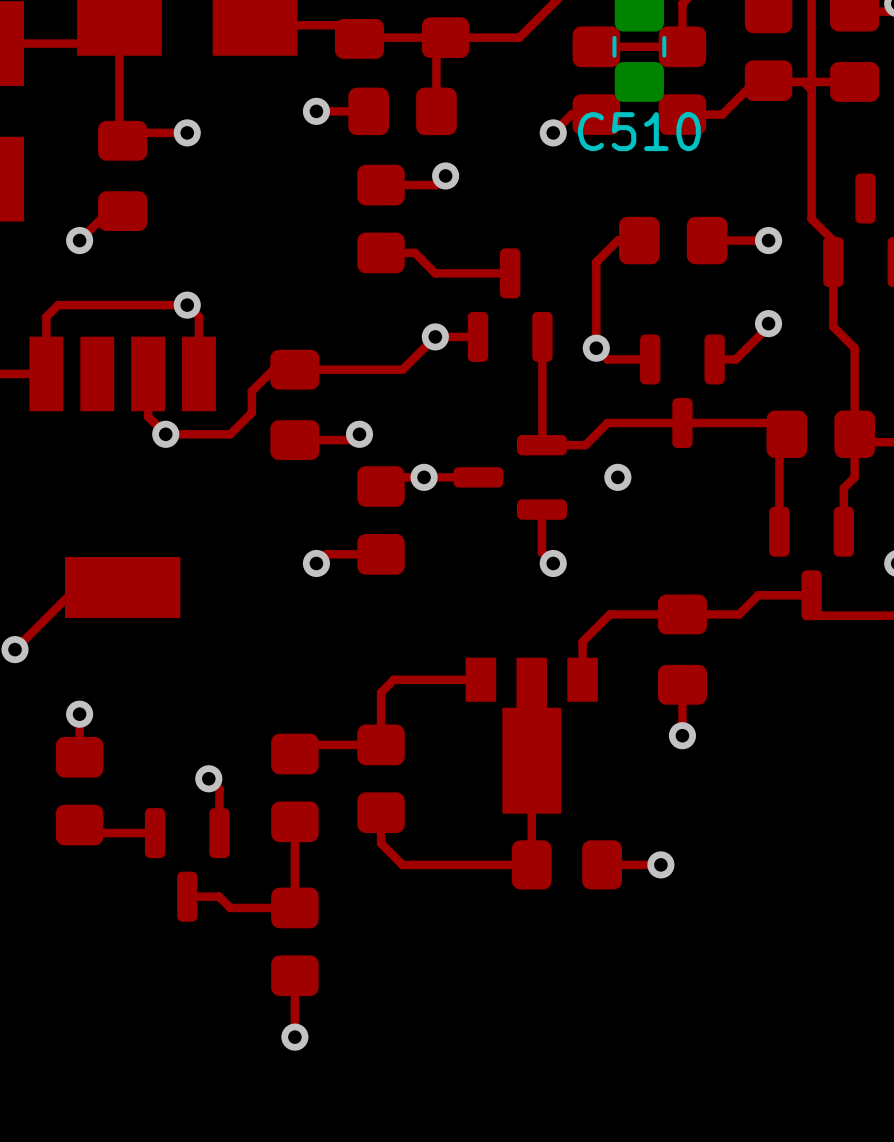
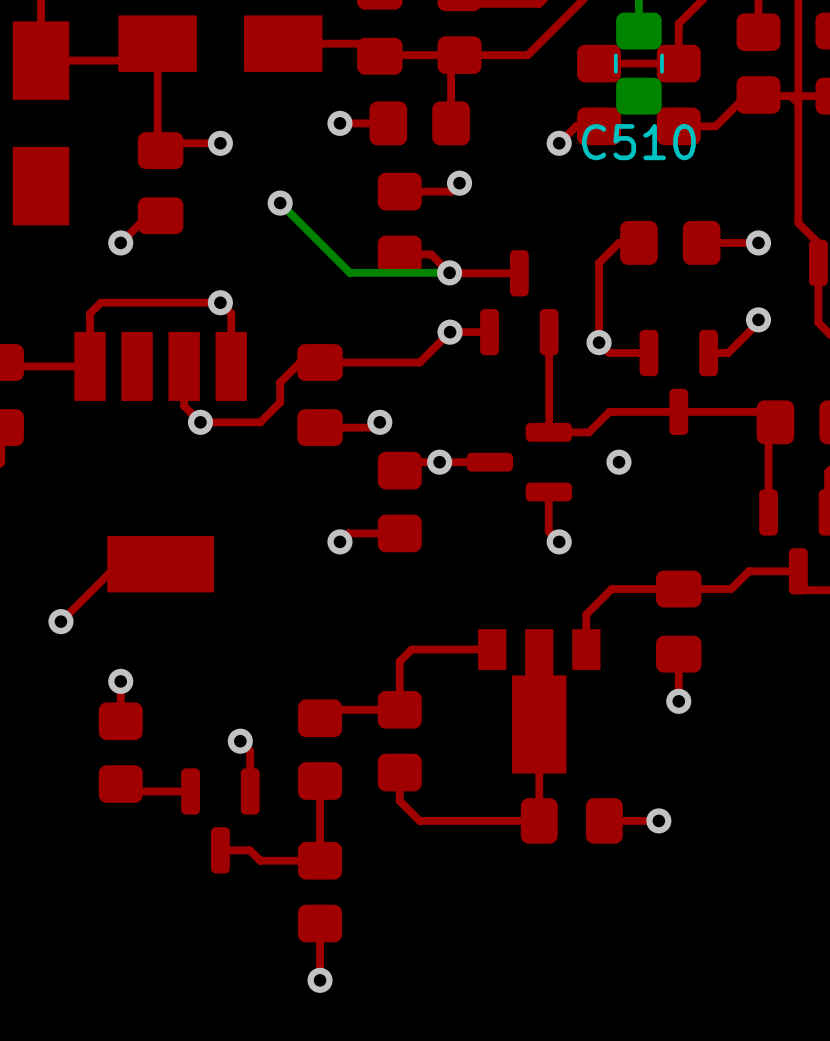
bottom track: none -> (280, 203) (349, 272) (449, 272)
via: none -> (280, 203)
via: none -> (449, 272)

